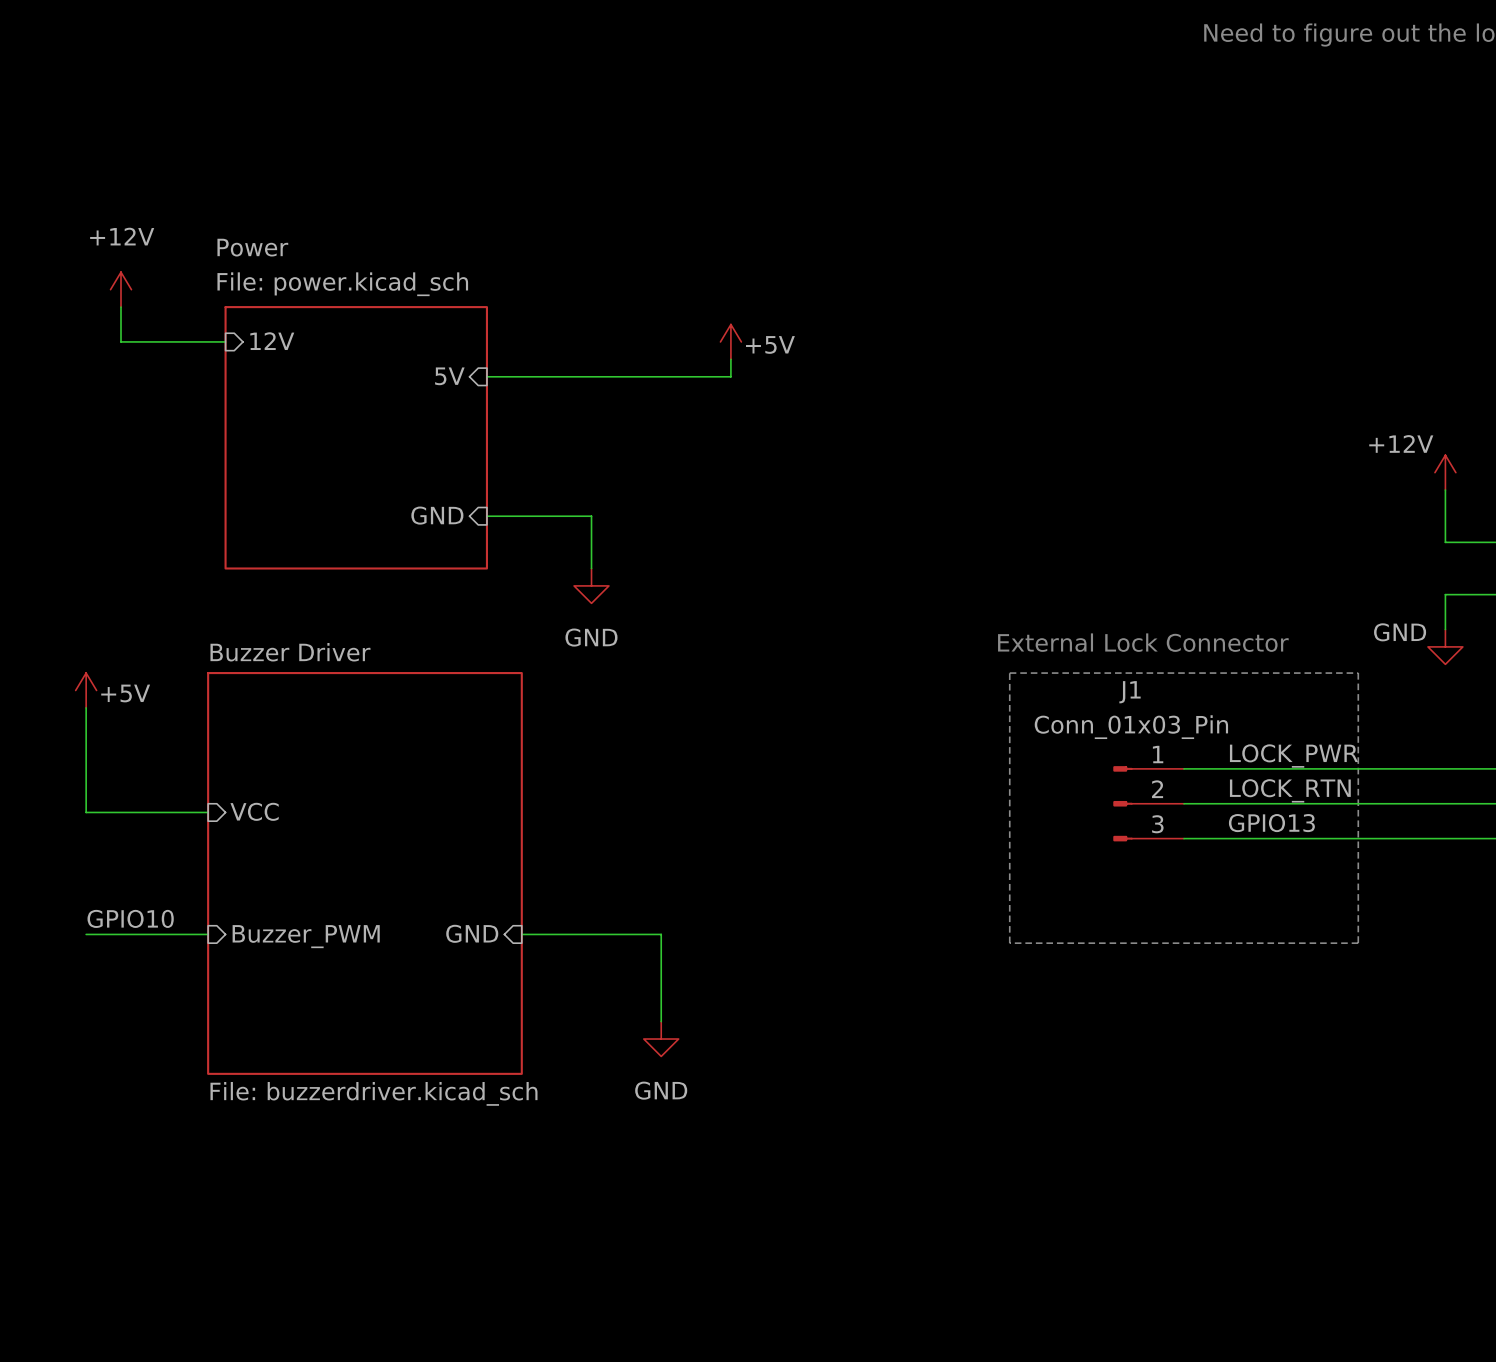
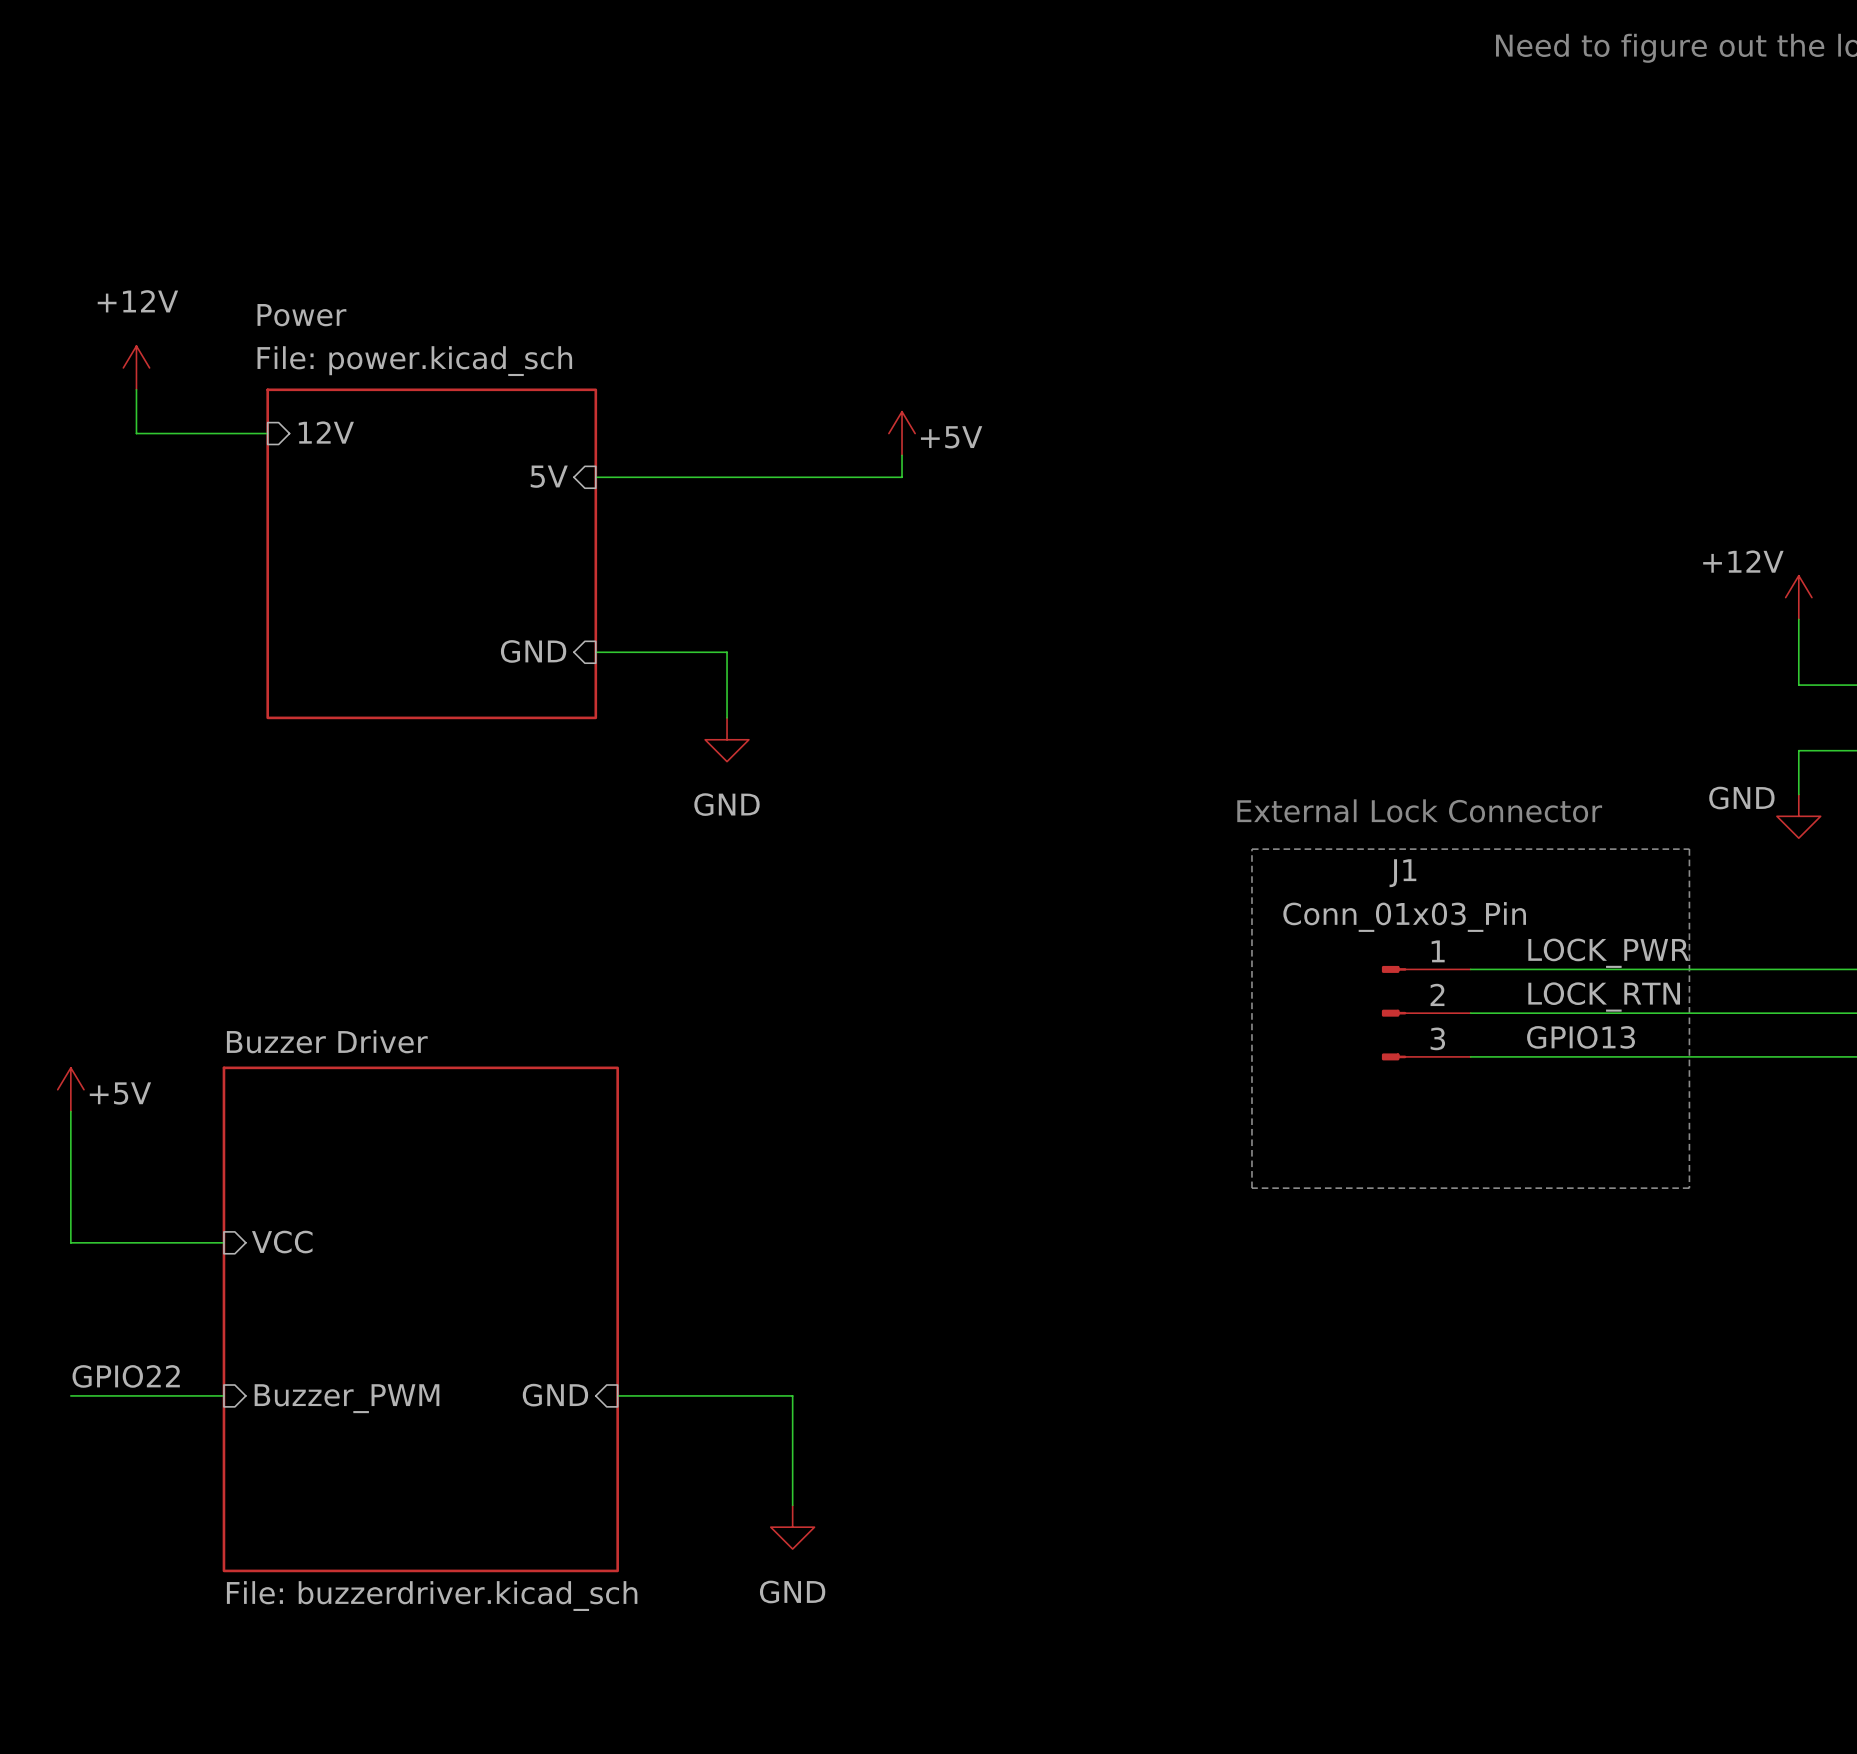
power symbol position: +5V (86, 690) -> +5V (70, 1089)
wire: (86, 707) (86, 812) (208, 812) -> (70, 1111) (70, 1242) (223, 1242)
sheet pin position: VCC (254, 811) -> VCC (282, 1242)
sheet Buzzer Driver position: (364, 873) -> (420, 1319)
label: GPIO10 (130, 918) -> none
sheet pin position: GND (472, 933) -> GND (555, 1395)
wire: (86, 934) (208, 934) -> (70, 1395) (223, 1395)
wire: (521, 934) (661, 934) (661, 1021) -> (617, 1395) (792, 1395) (792, 1505)
sheet pin position: Buzzer_PWM (306, 936) -> Buzzer_PWM (347, 1398)
power symbol position: GND (661, 1039) -> GND (792, 1527)
label: none -> GPIO22 (126, 1376)

